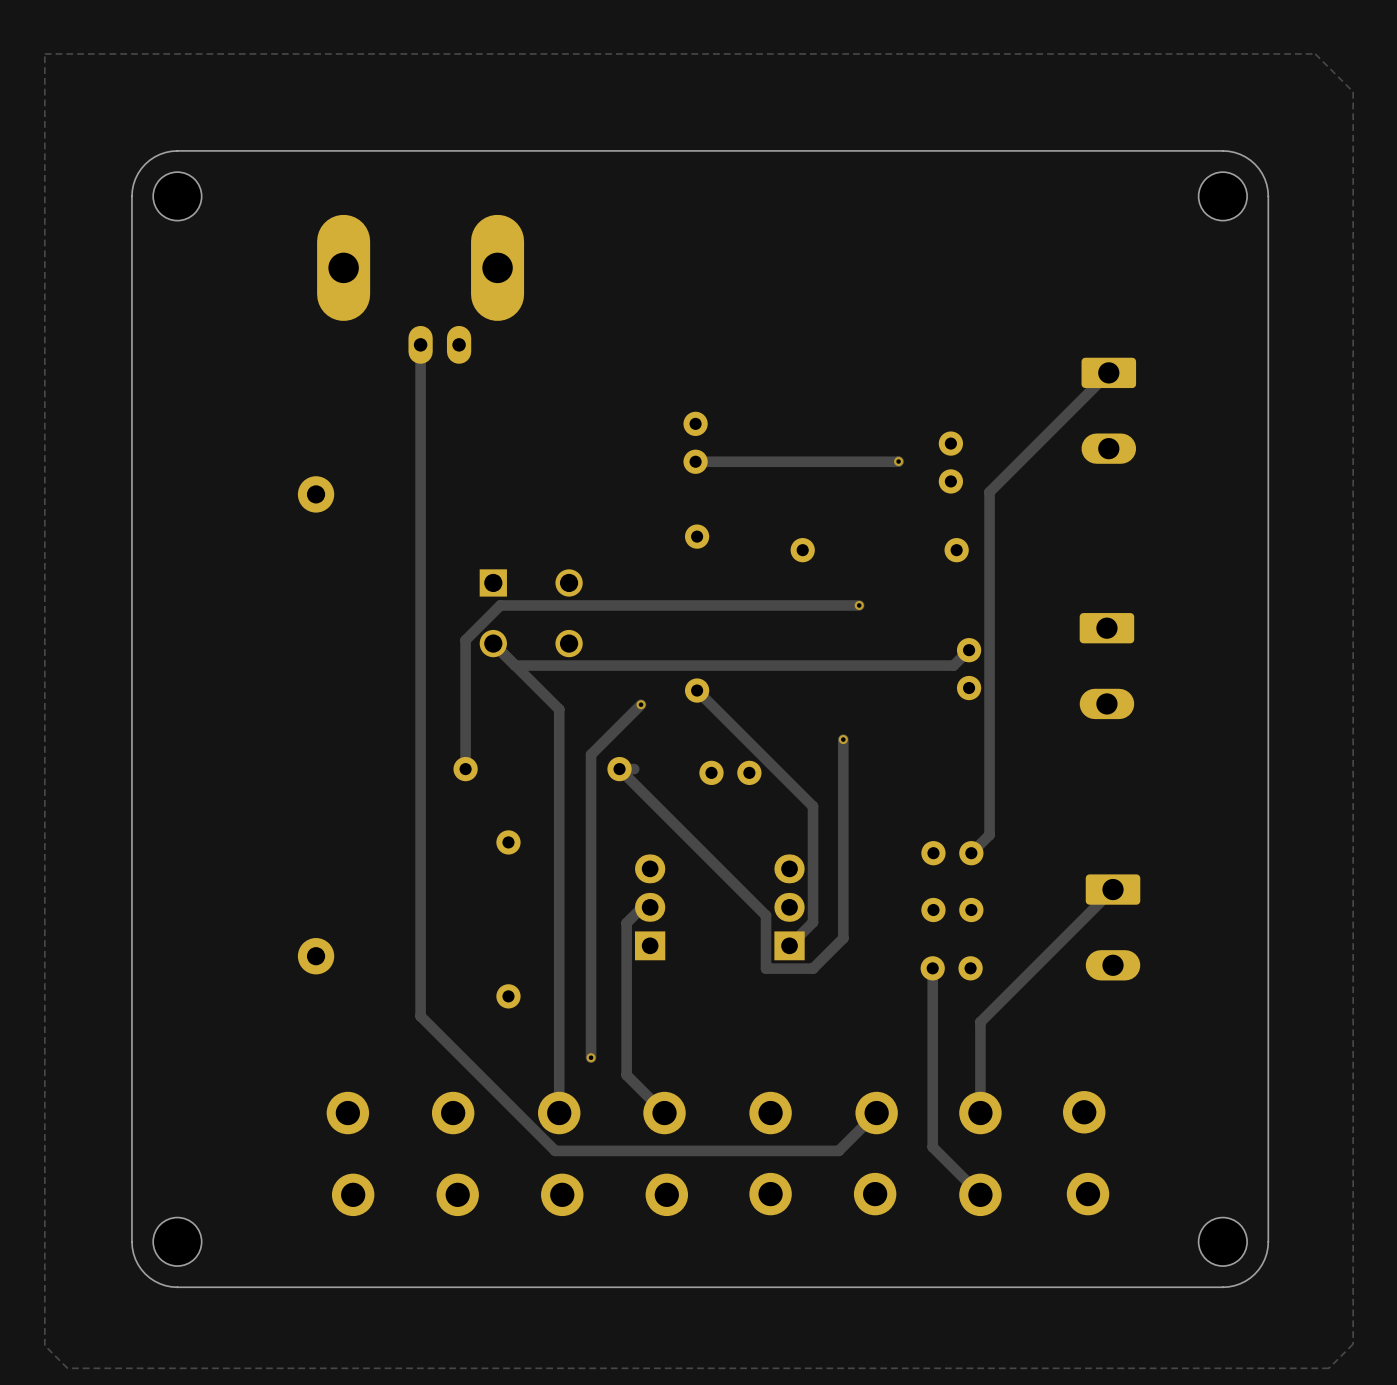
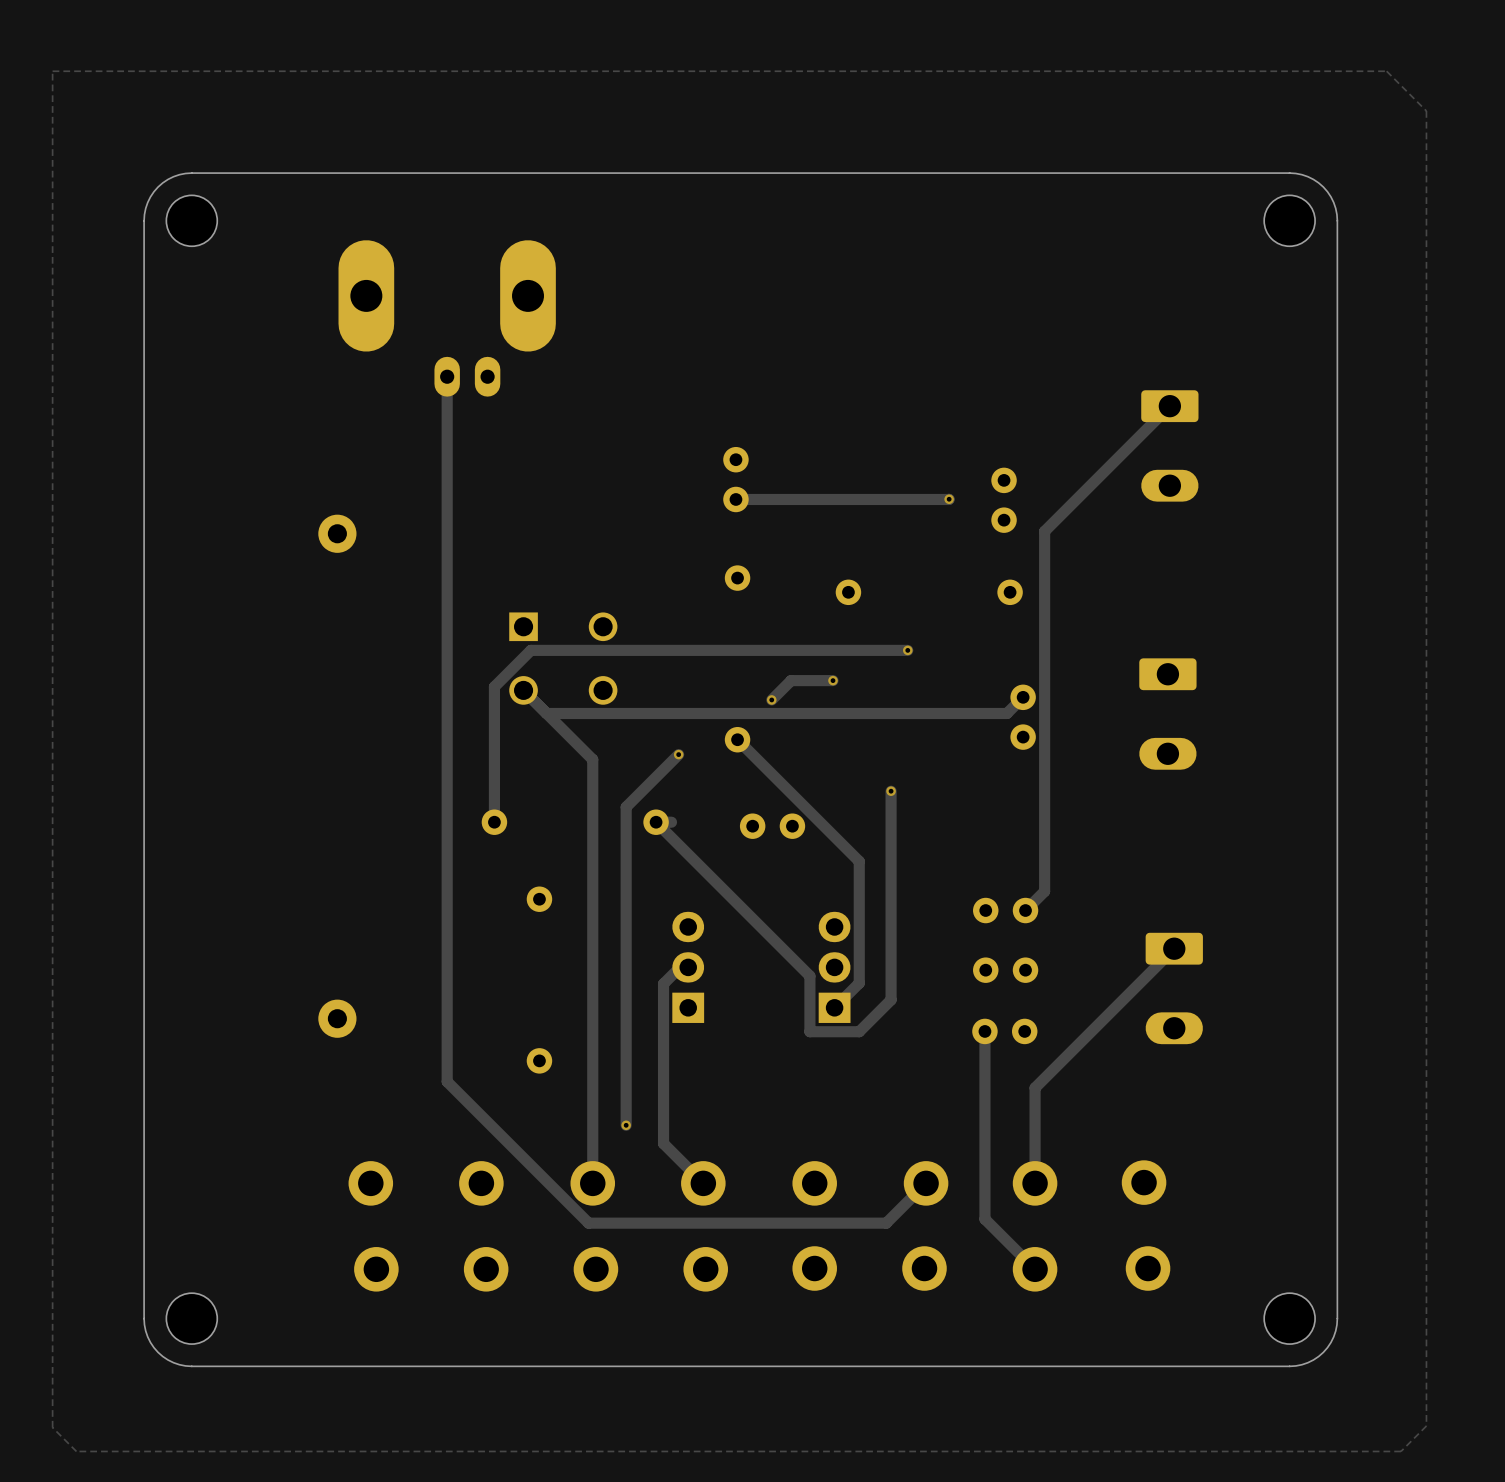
track: none -> (833, 680) (791, 680) (771, 699)
via: none -> (833, 680)
via: none -> (771, 699)

